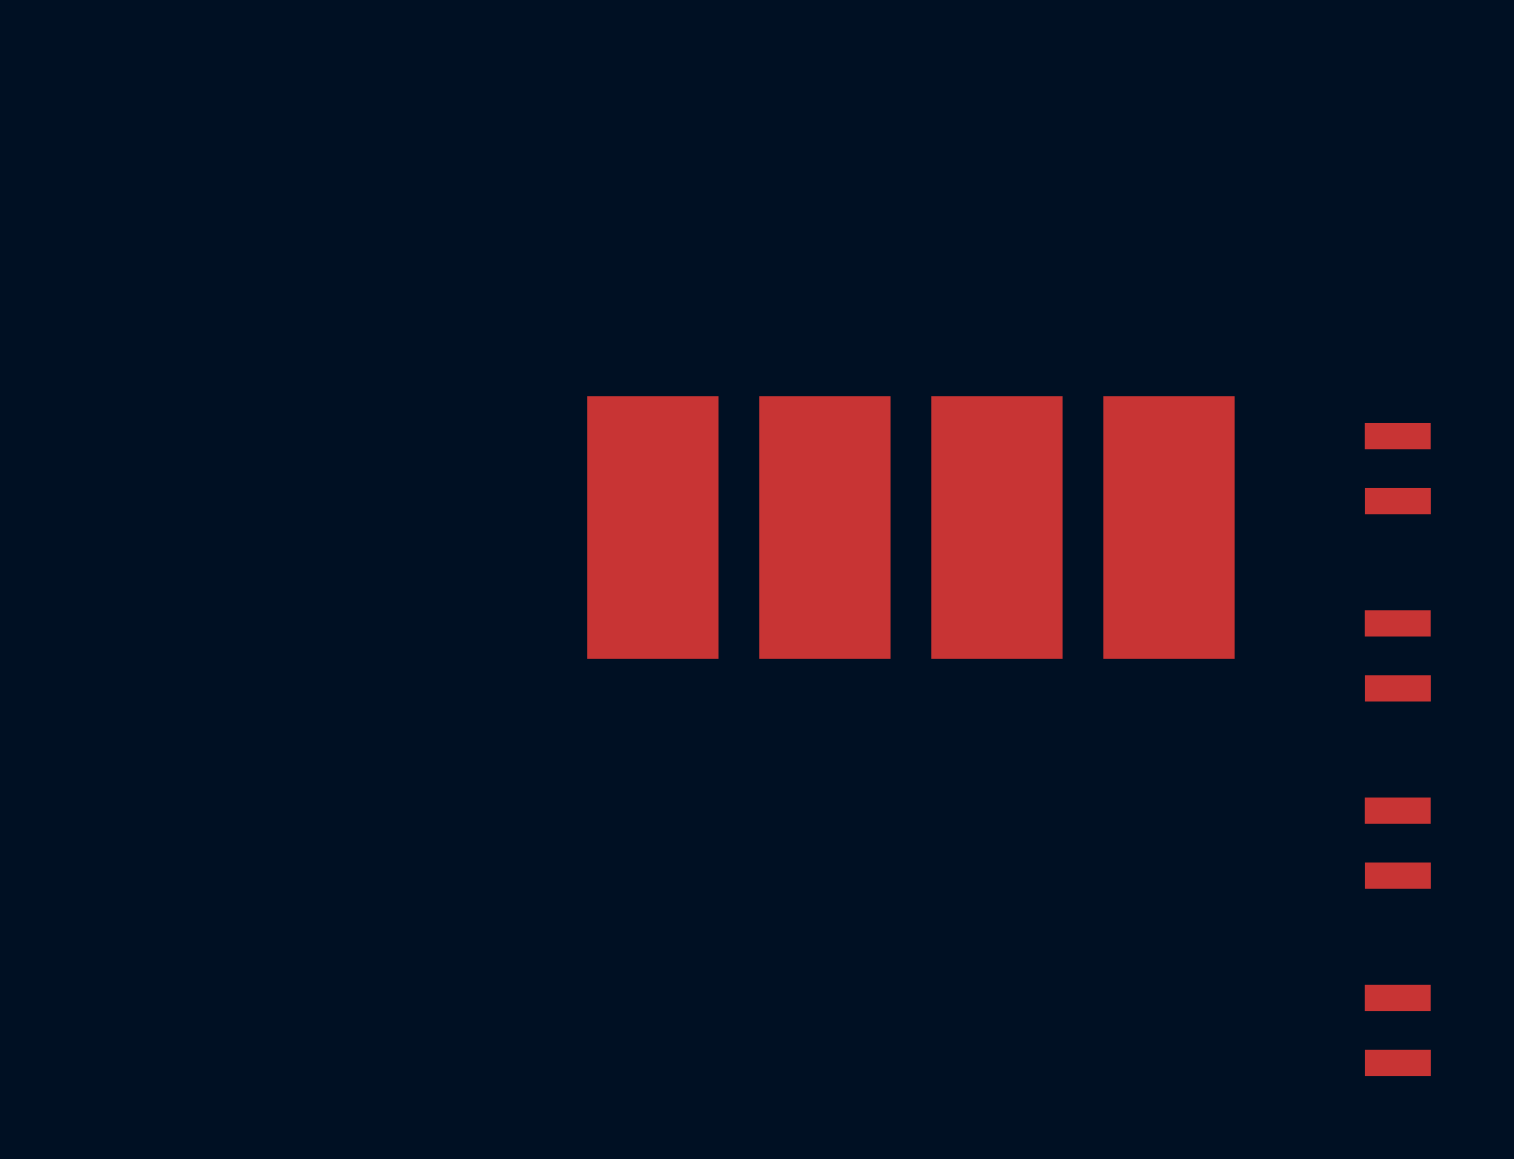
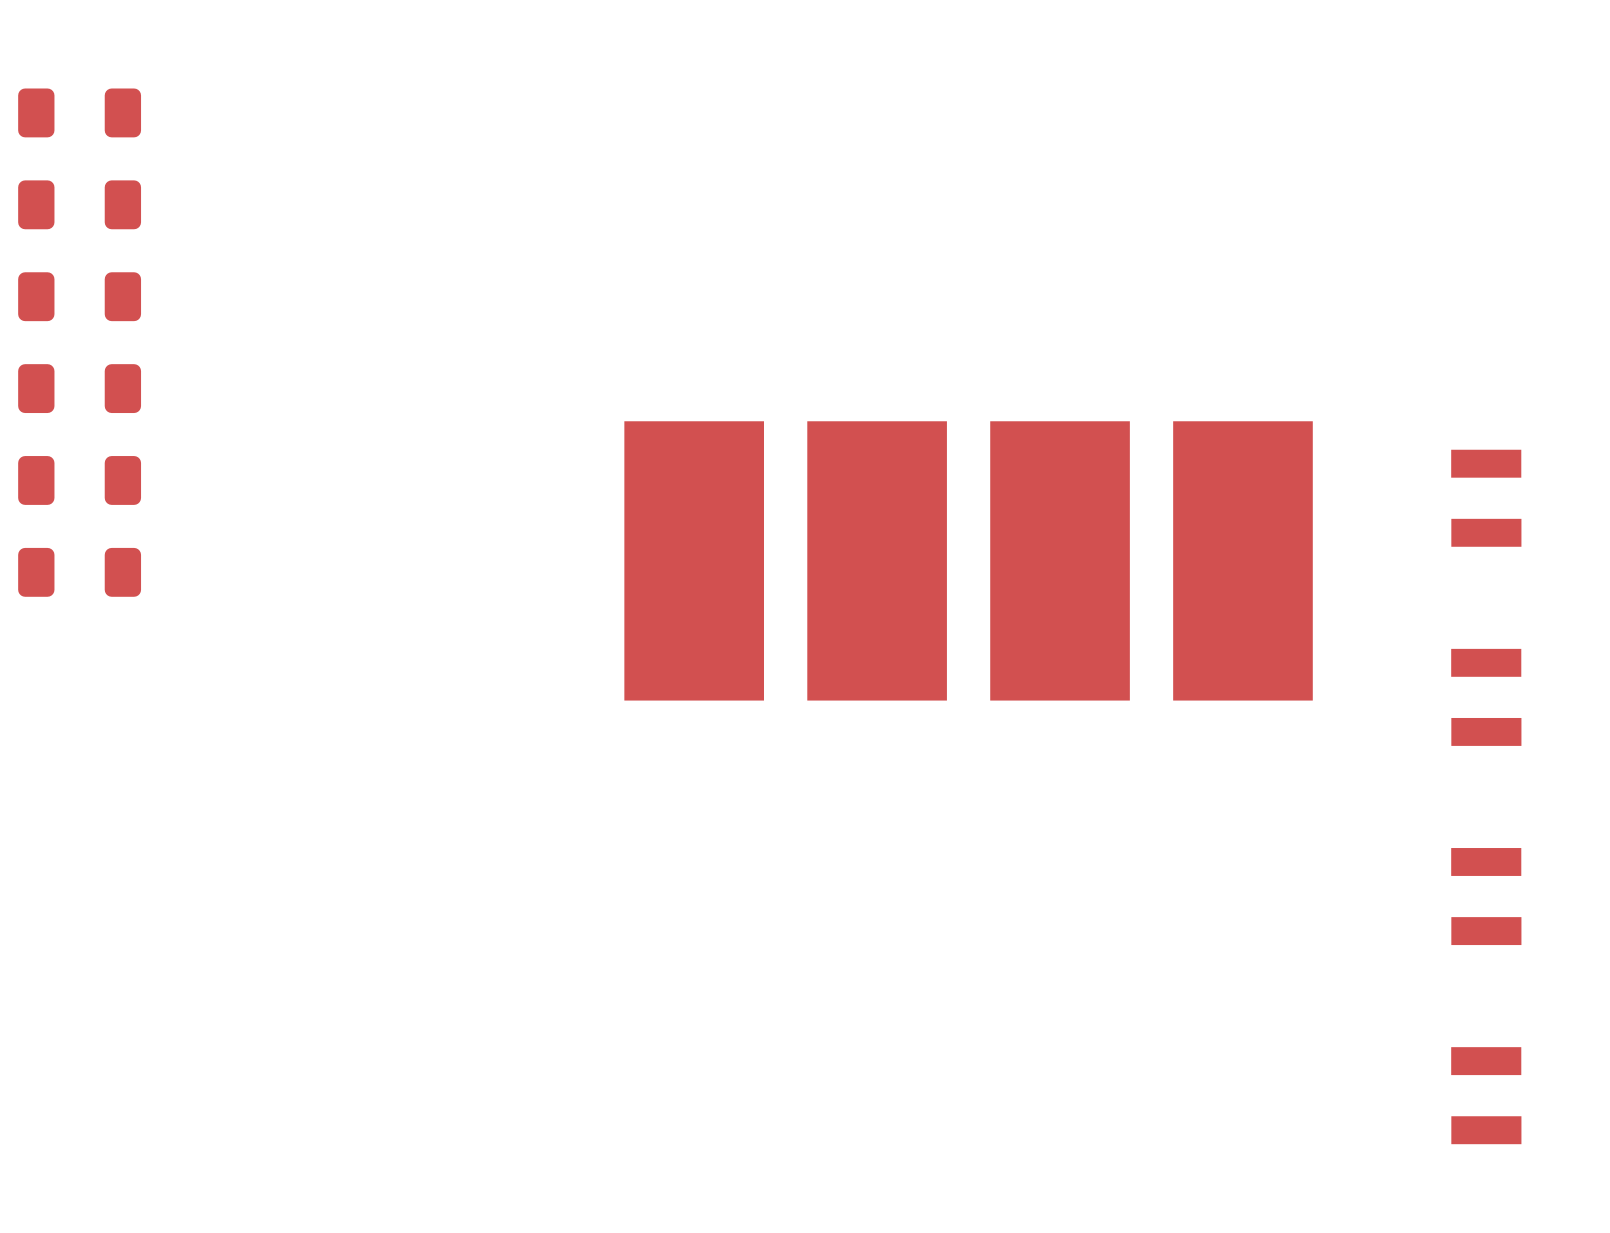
part: none -> (79, 112)
part: none -> (79, 204)
part: none -> (79, 296)
part: none -> (79, 388)
part: none -> (79, 480)
part: none -> (79, 572)

